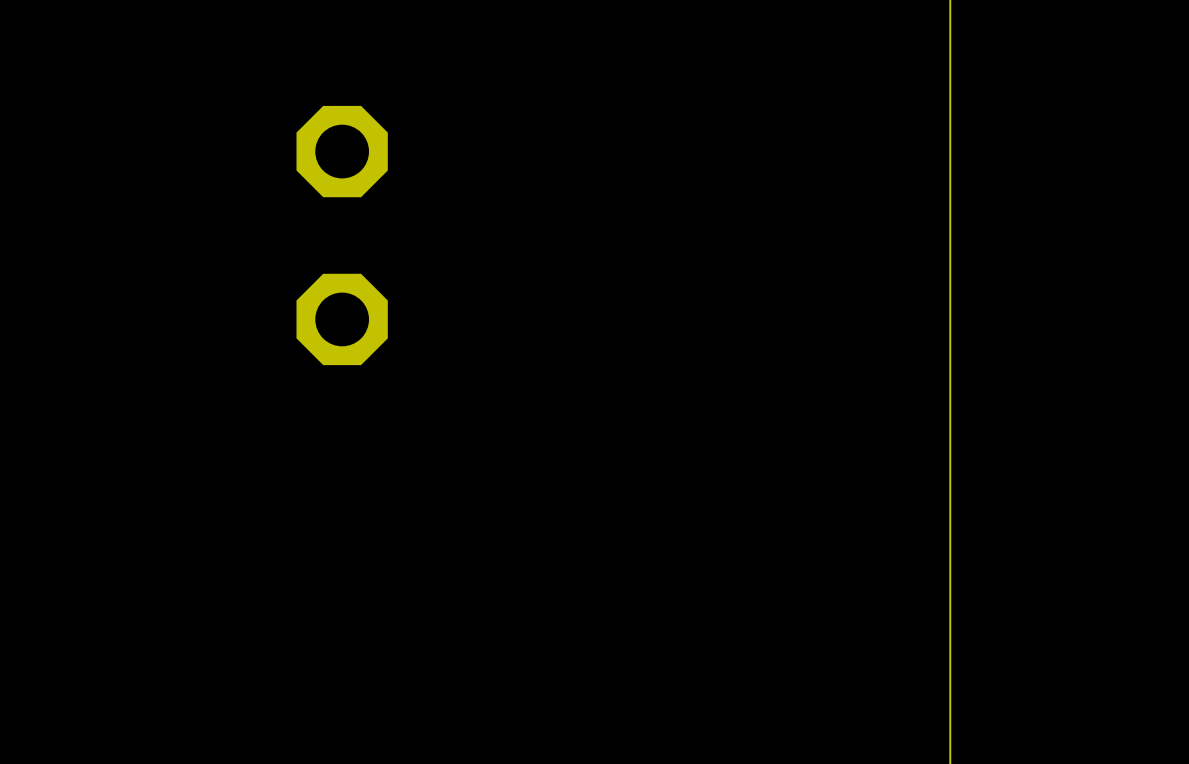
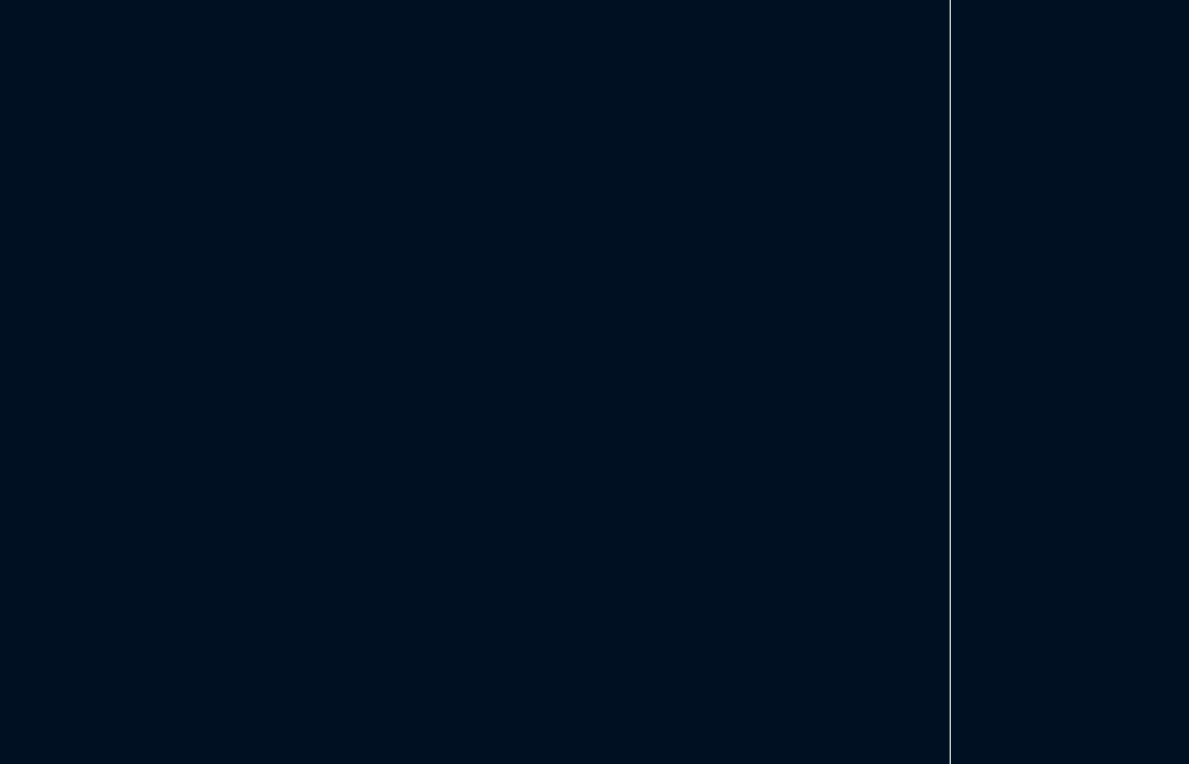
part: (342, 235) -> none

